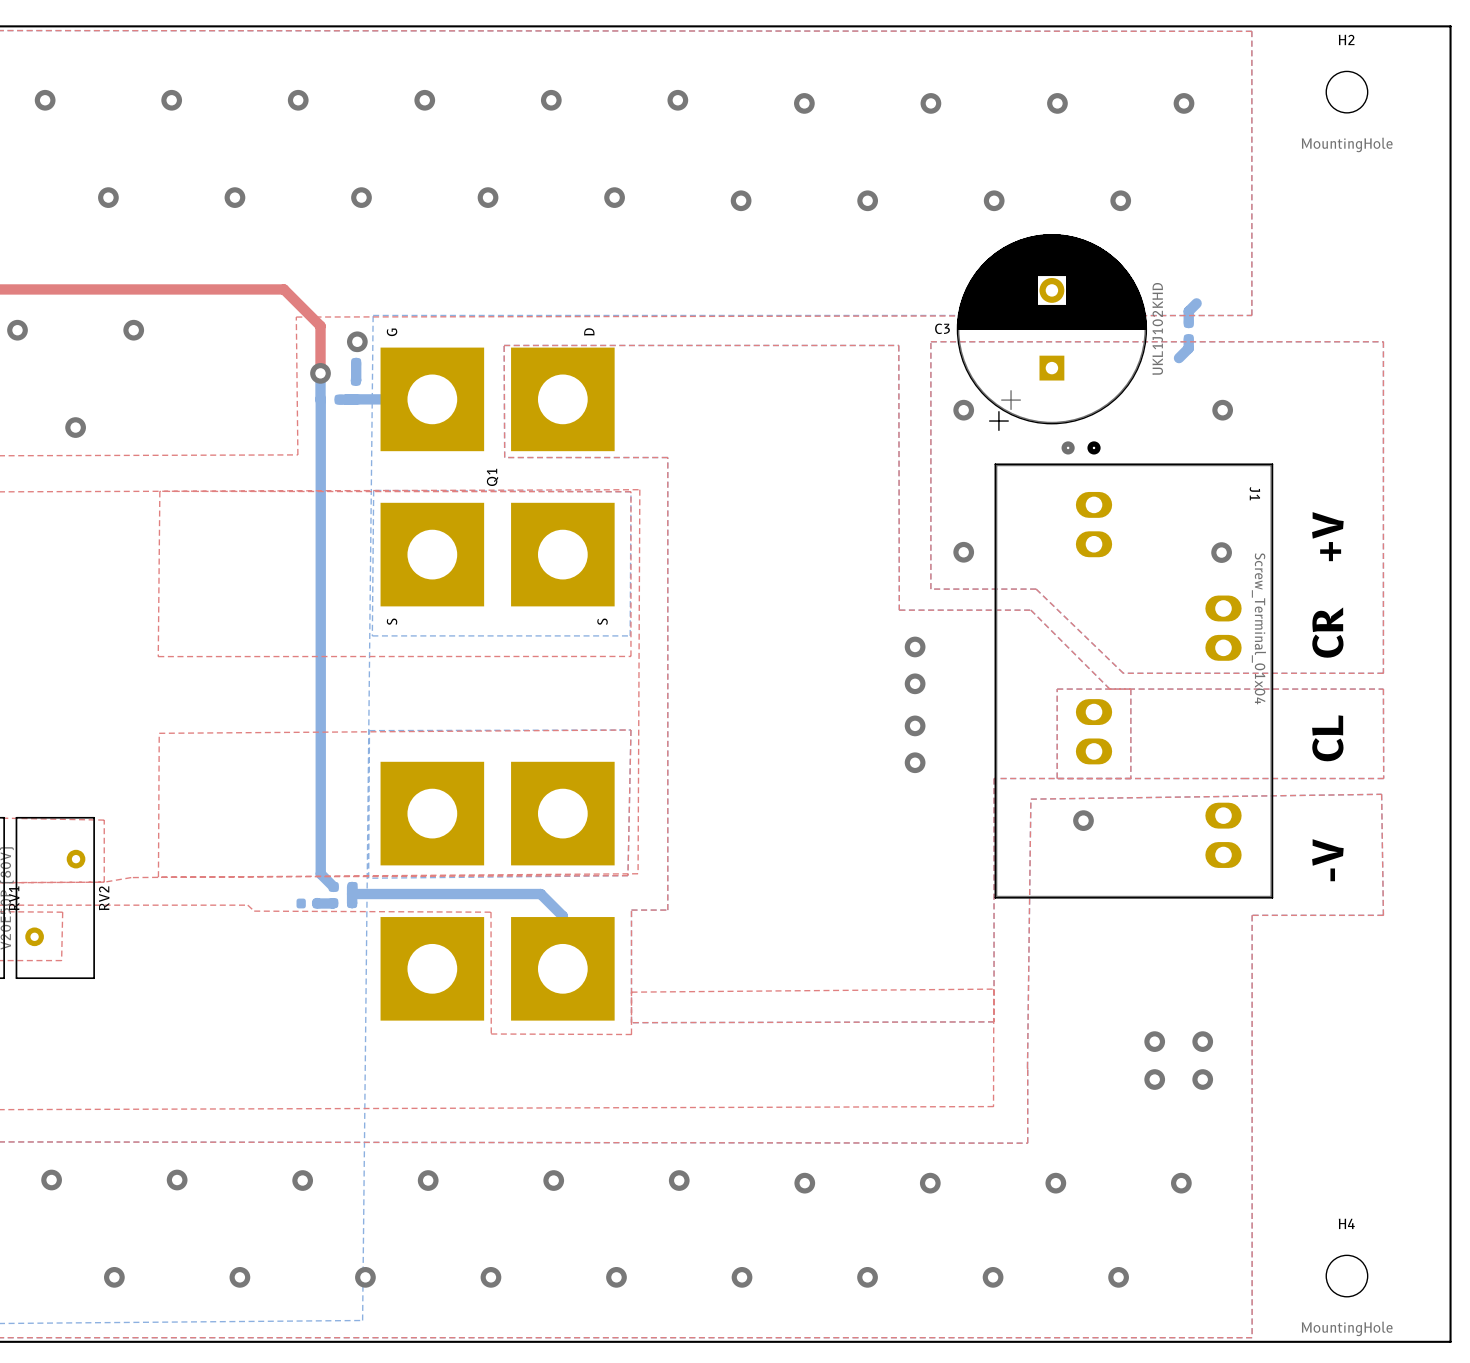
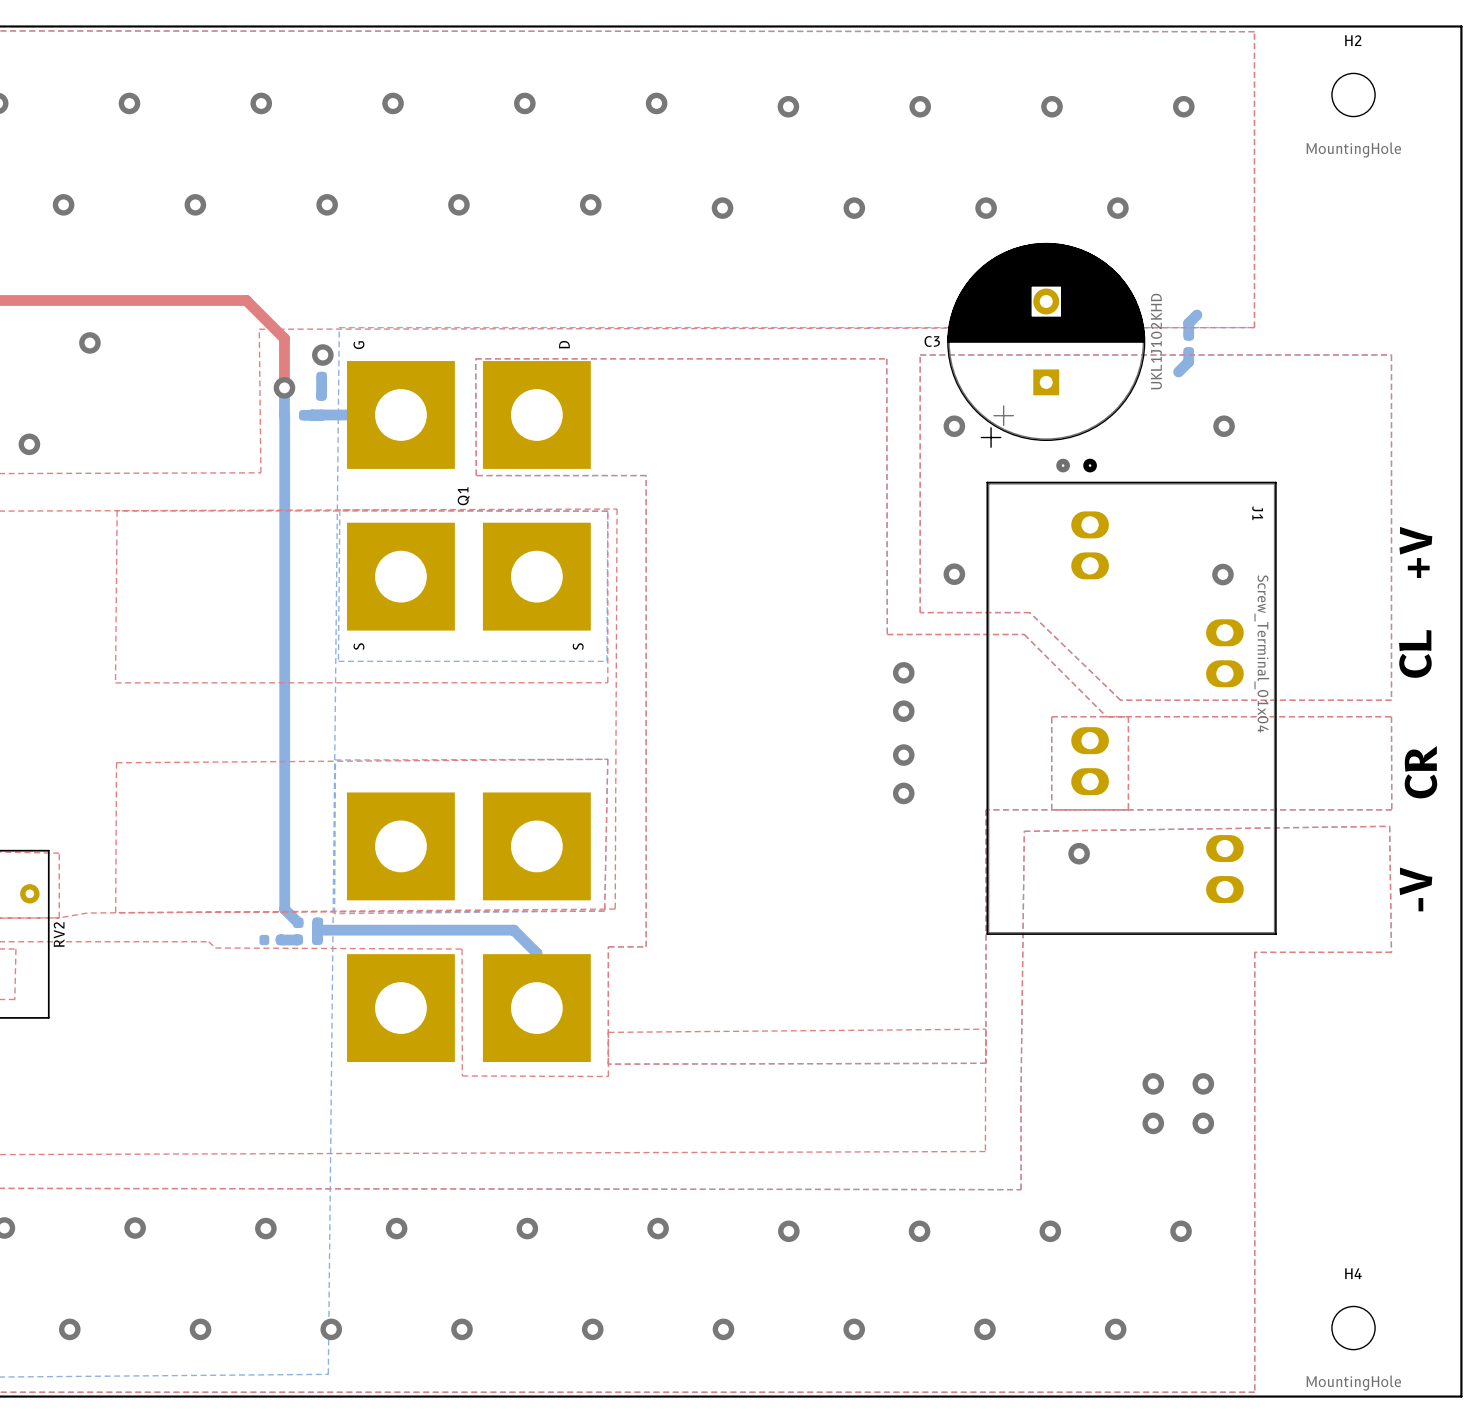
text position: +V (1327, 536) -> +V (1415, 552)
text position: CR (1327, 632) -> CR (1420, 772)
text position: CL (1327, 738) -> CL (1415, 653)
text position: -V (1327, 860) -> -V (1415, 889)

